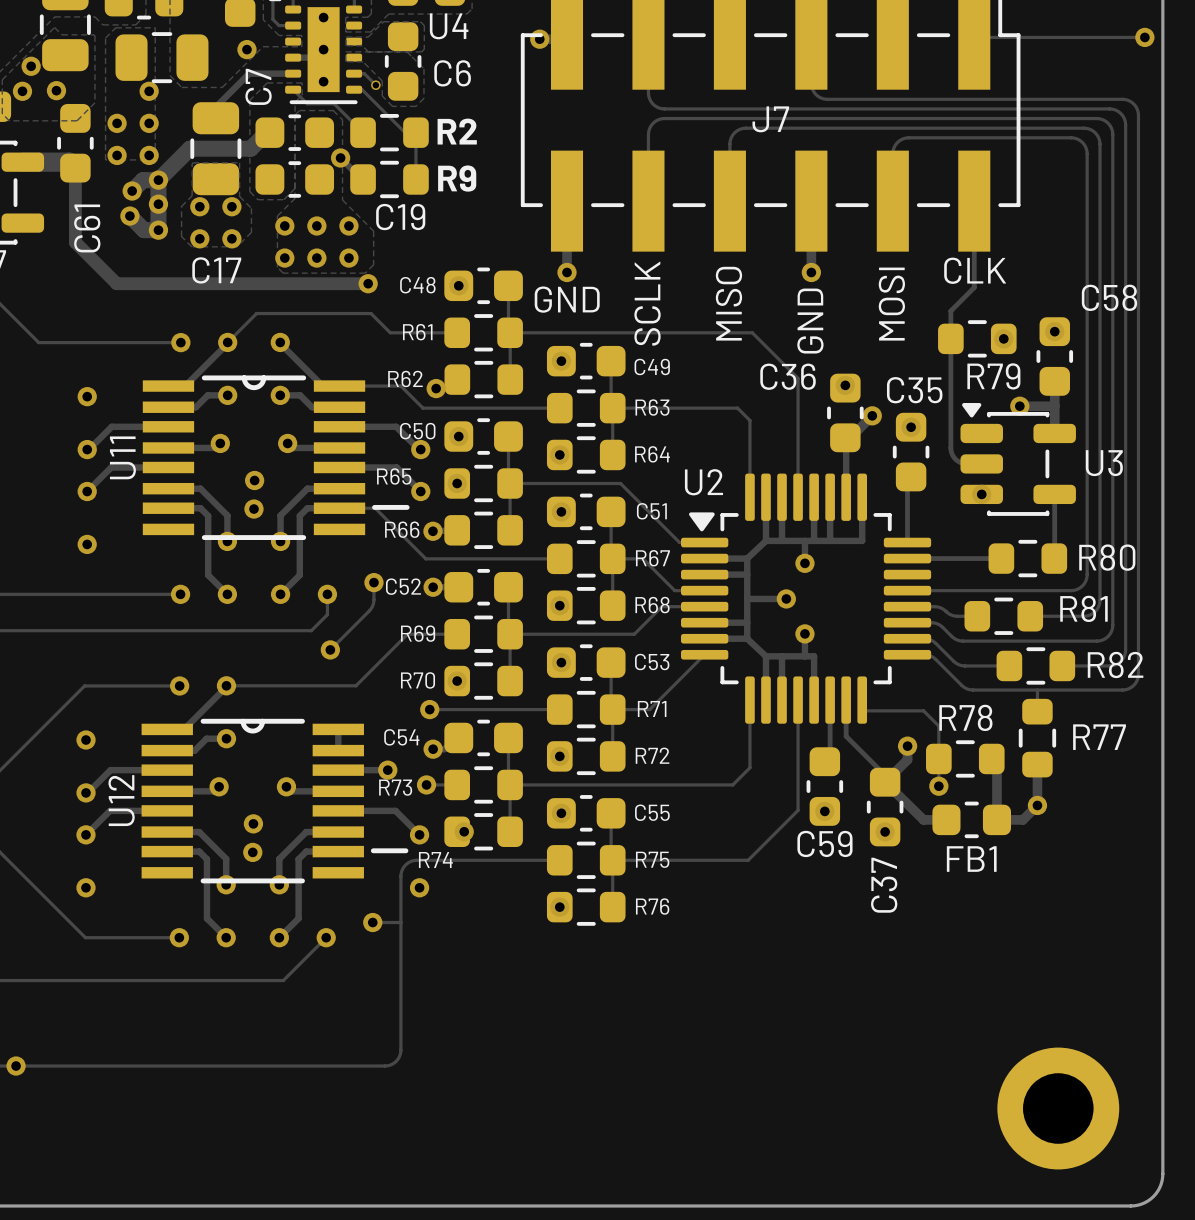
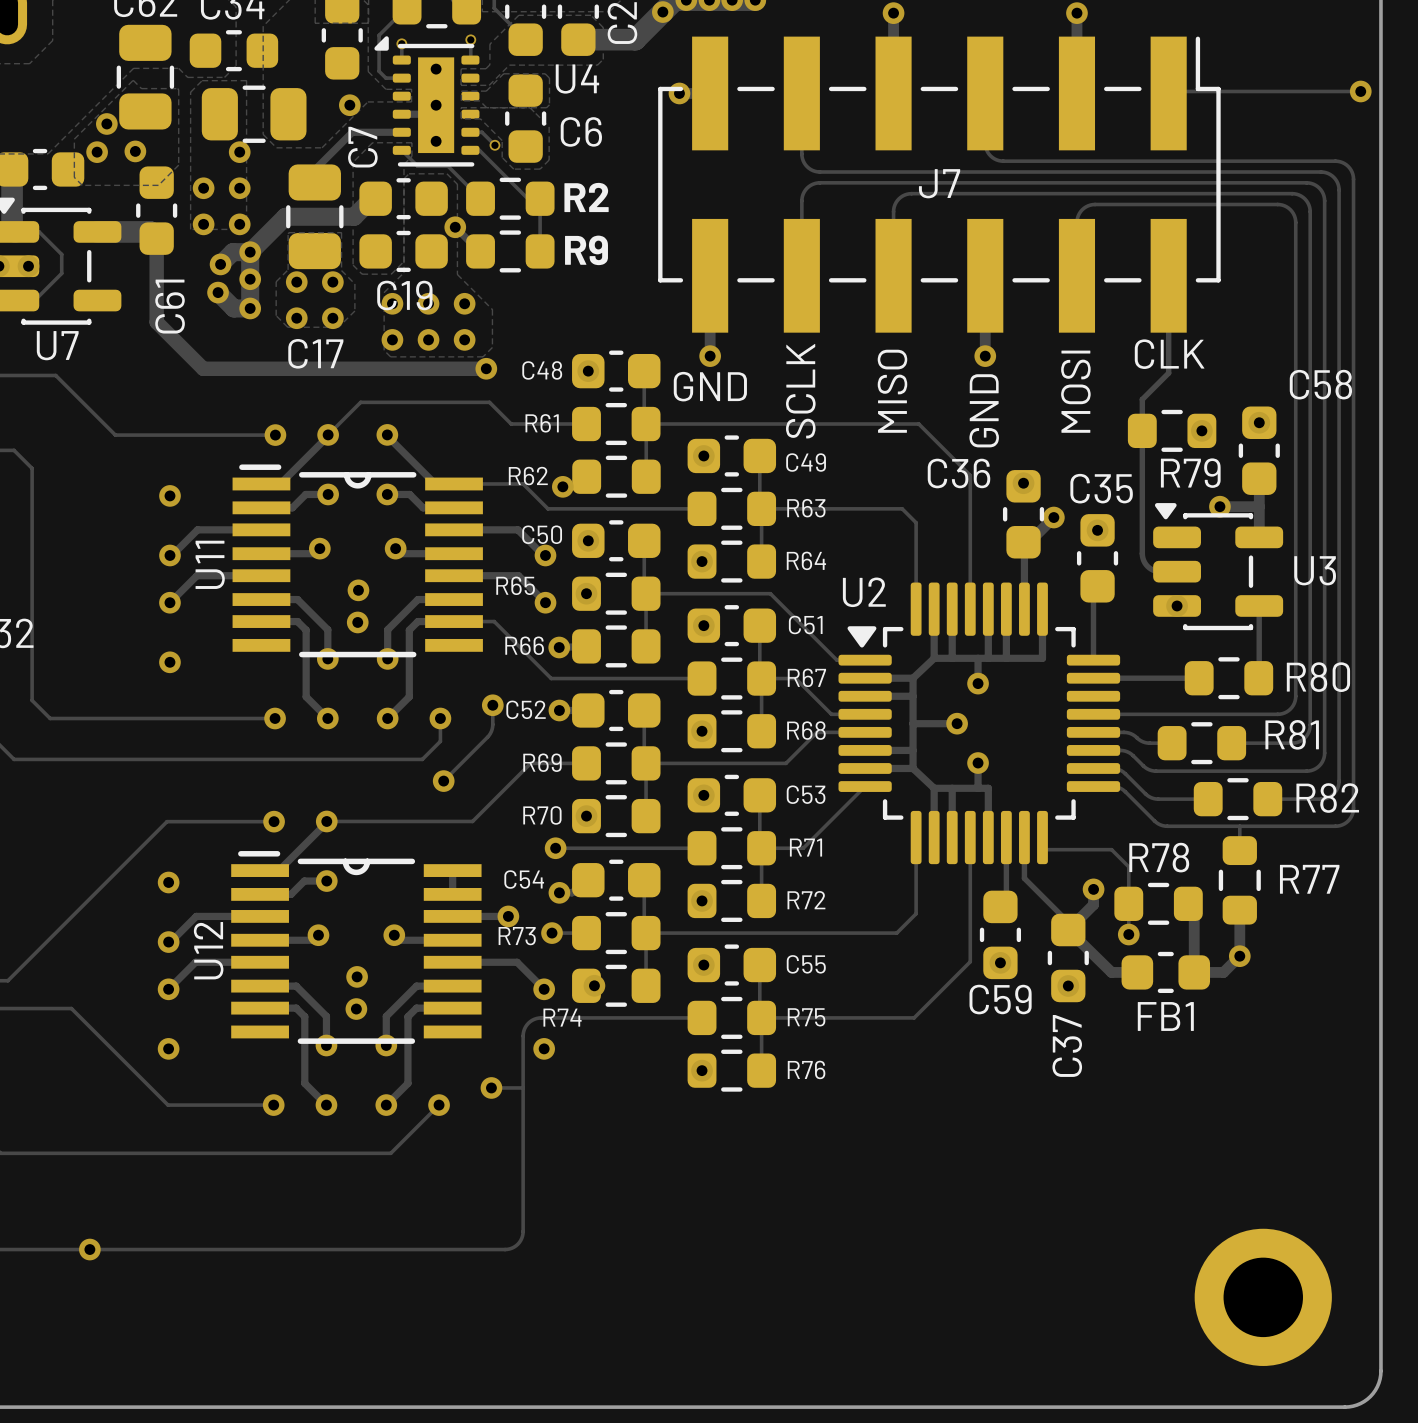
C19 name position: C19 (400, 217) -> C19 (404, 295)
U11 footprint: [142, 375, 410, 541] -> [232, 464, 483, 658]
U12 footprint: [141, 718, 409, 884] -> [231, 851, 482, 1044]

